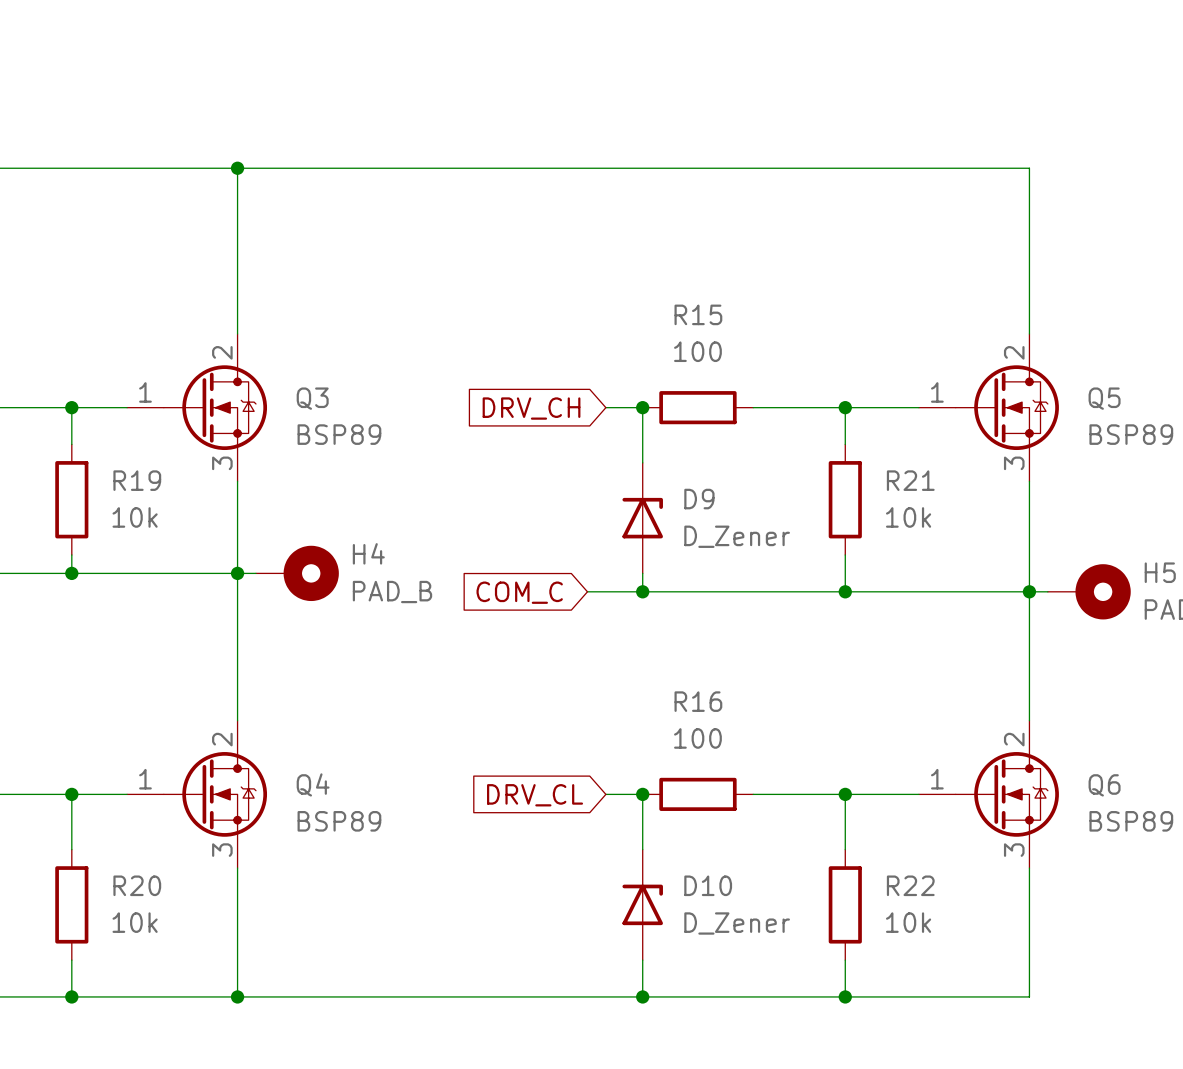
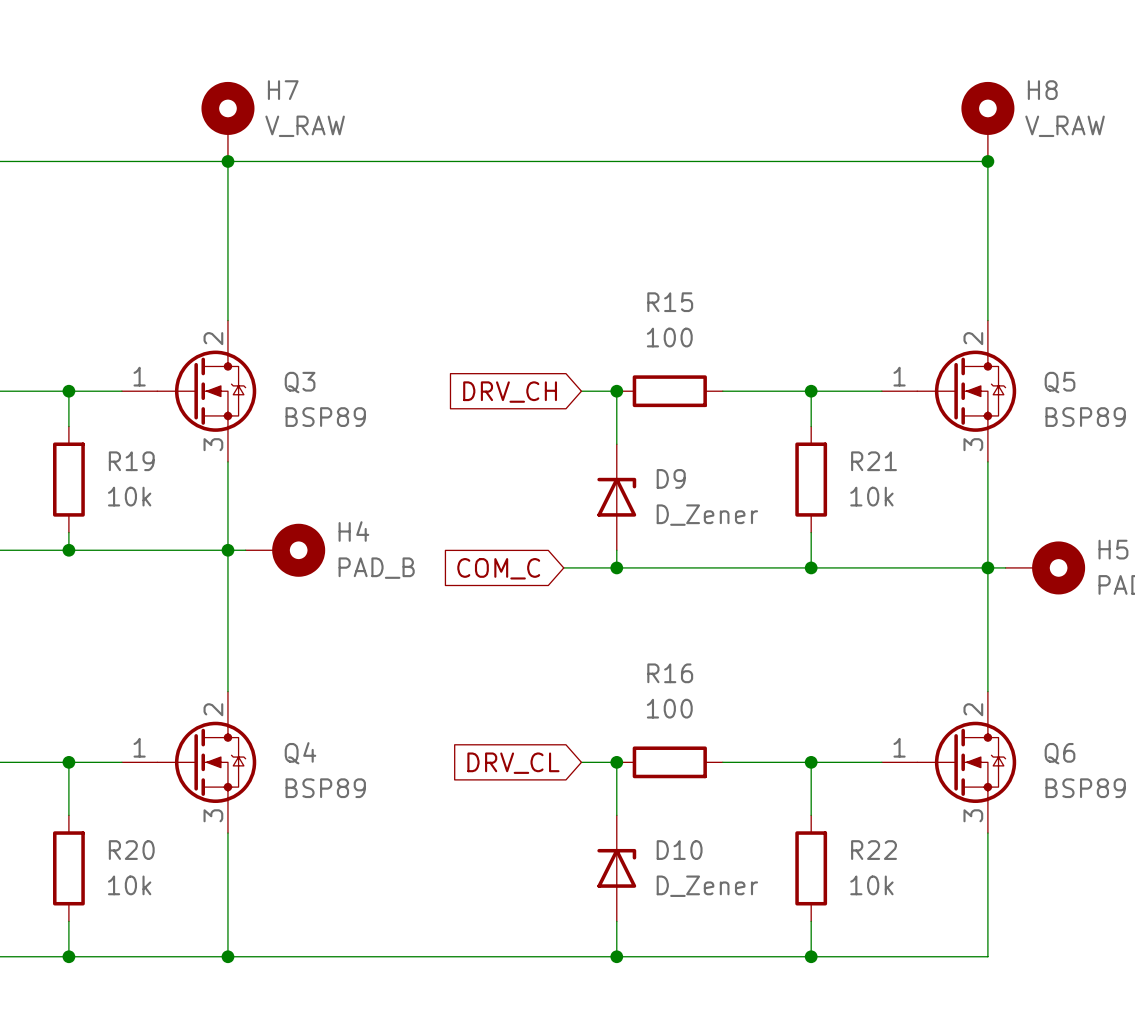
H7: none -> V_RAW (227, 121)
H8: none -> V_RAW (987, 121)
junction: none -> (987, 161)

